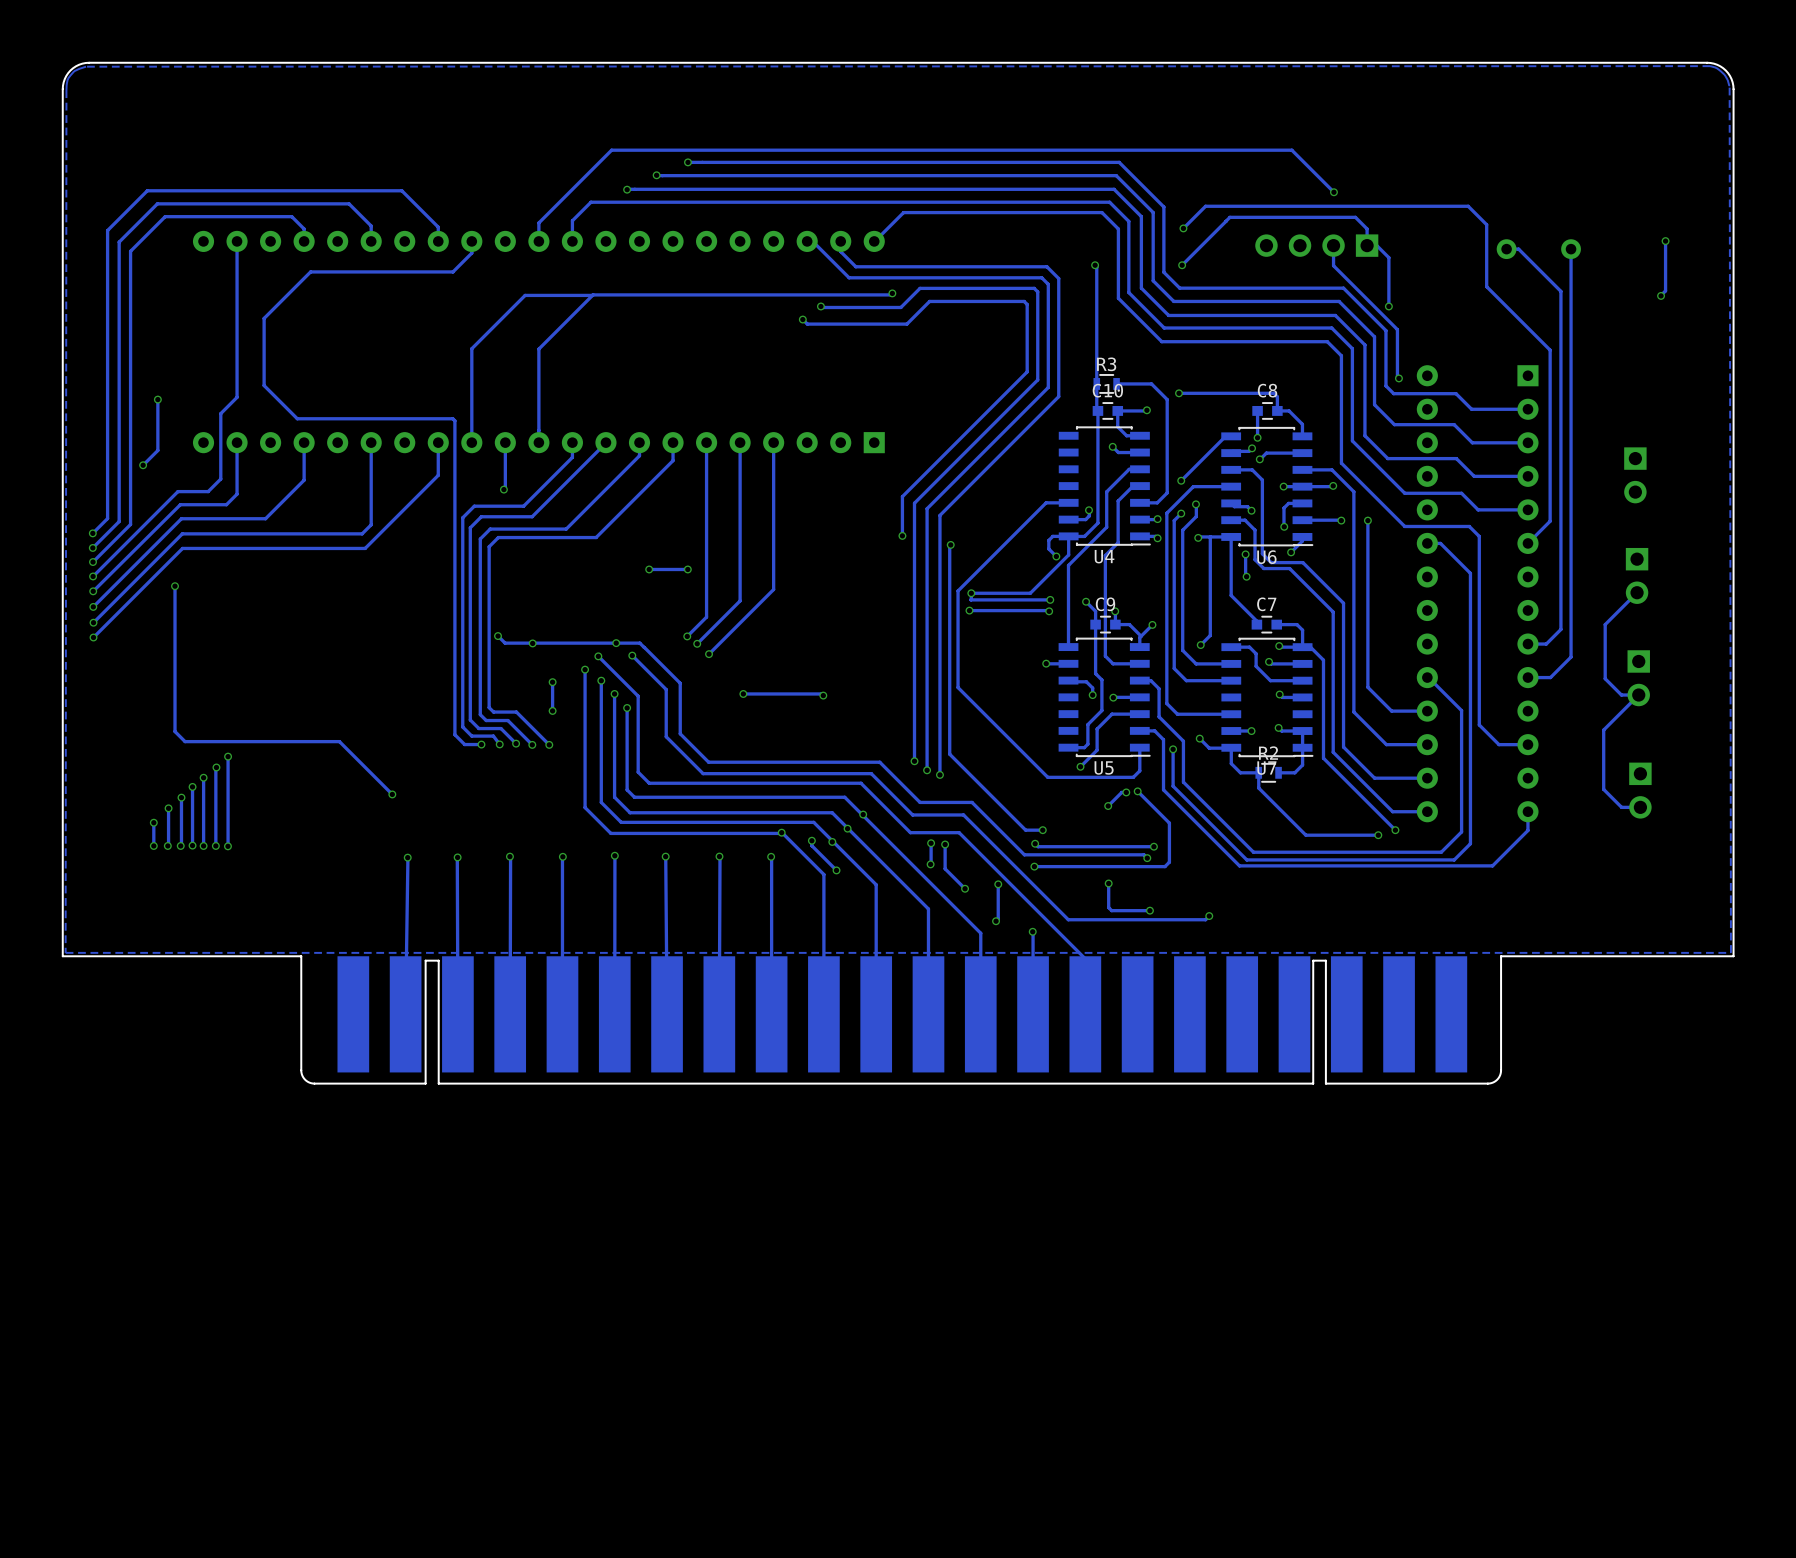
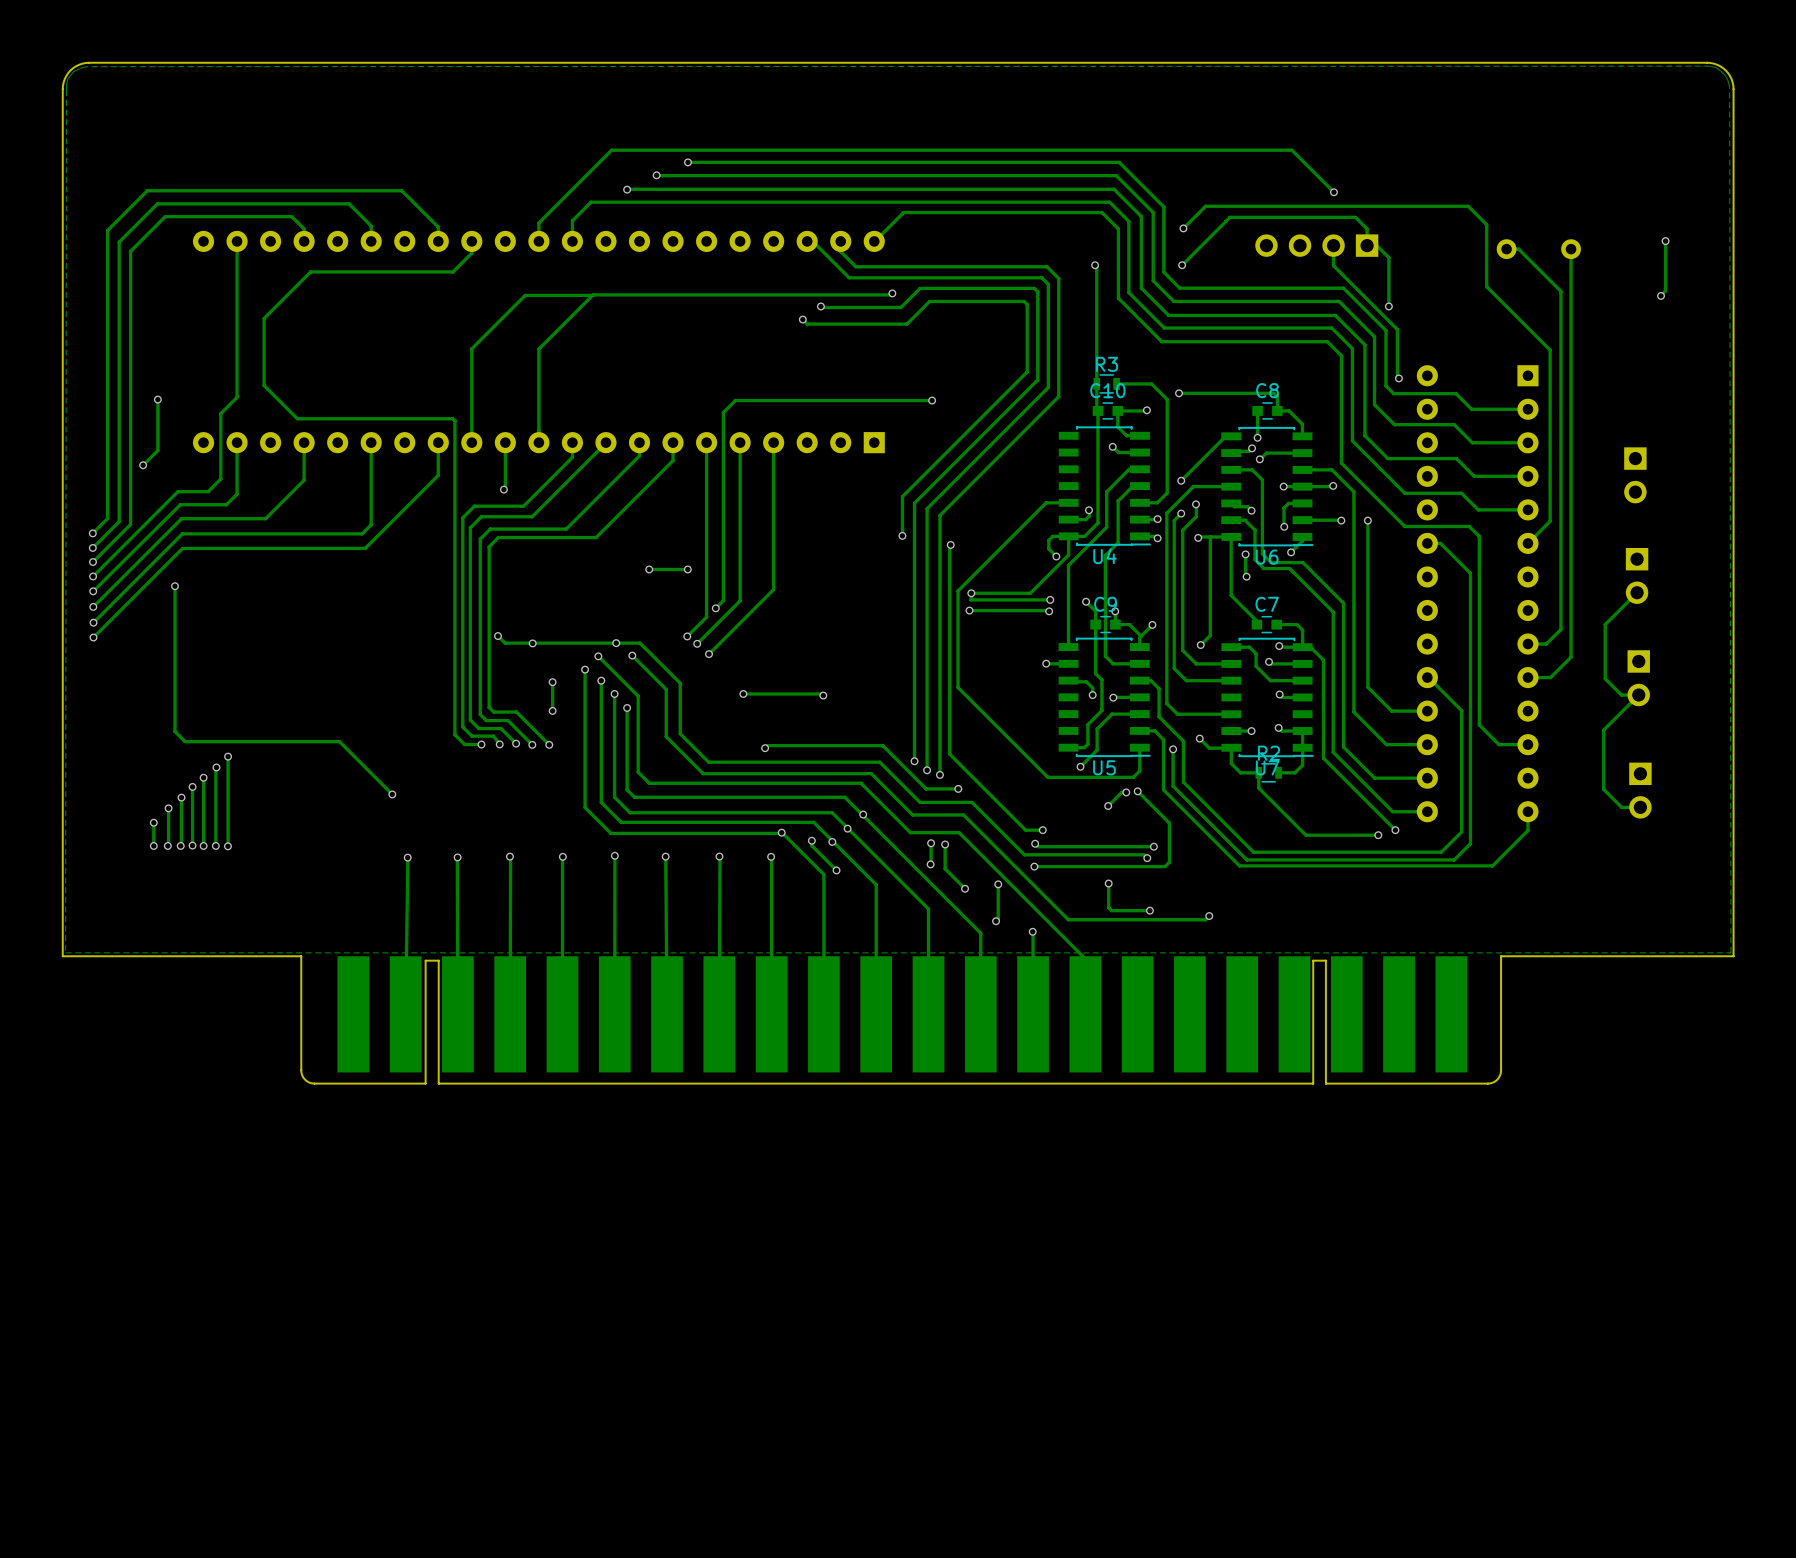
track: none -> (932, 400) (735, 400) (723, 412) (723, 600) (715, 608)
via: none -> (932, 400)
via: none -> (715, 608)
track: none -> (765, 748) (767, 745) (882, 745) (926, 788) (958, 788)
via: none -> (765, 748)
via: none -> (958, 788)

